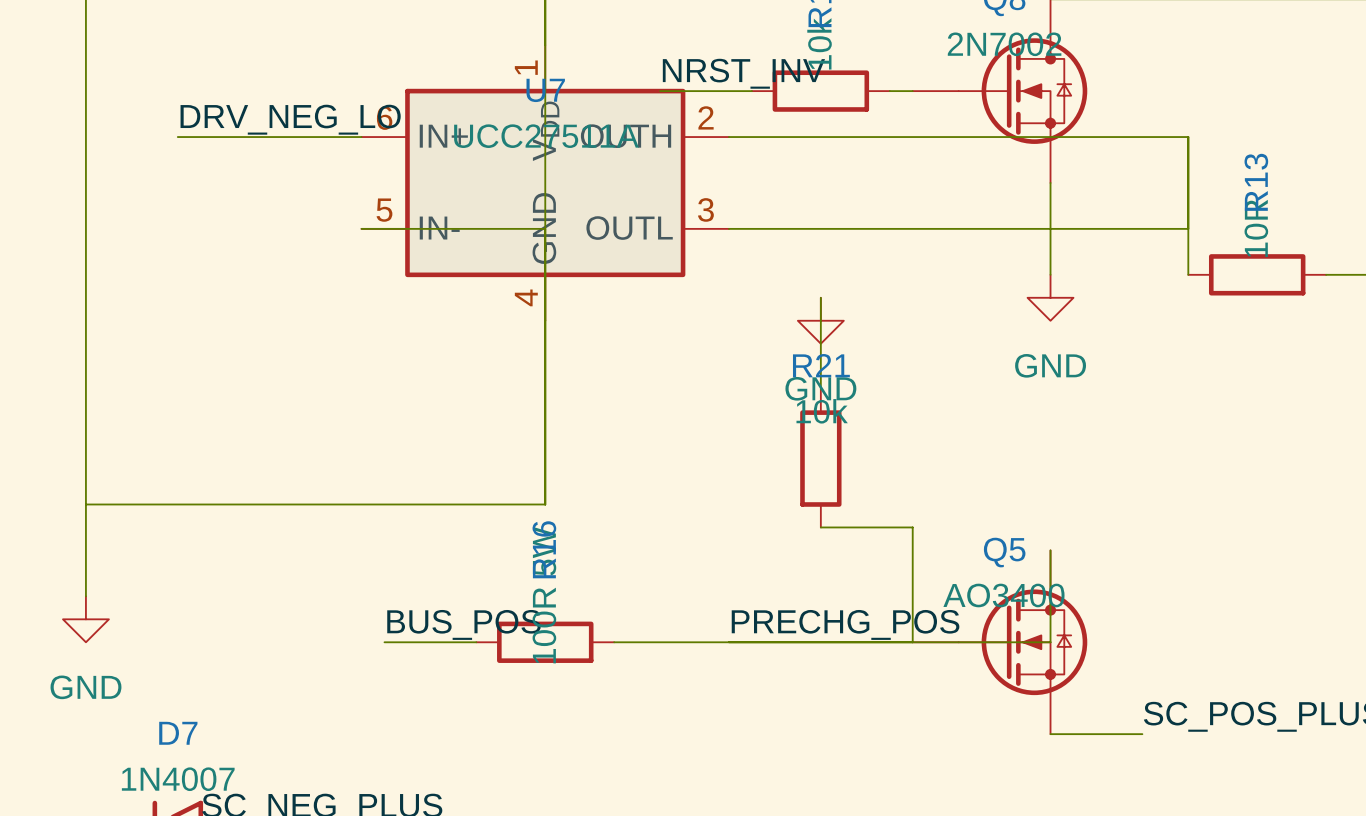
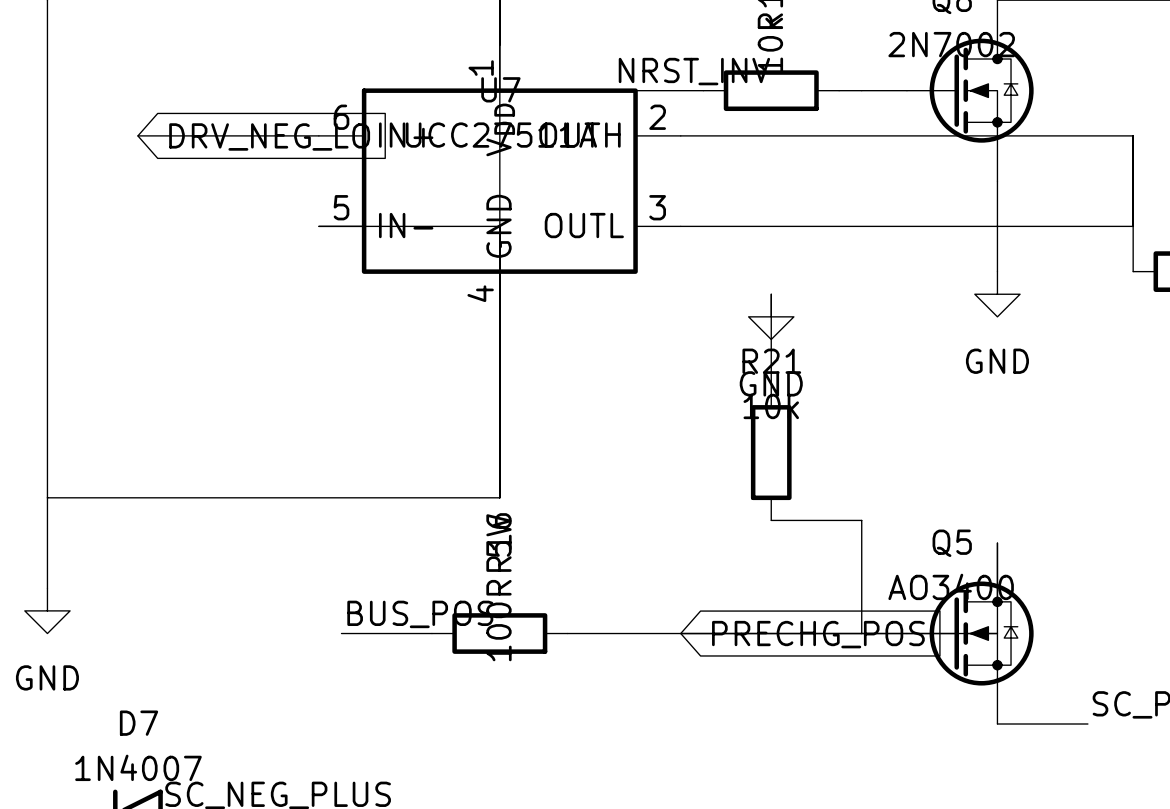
label: DRV_NEG_LO (290, 119) -> none
global label: none -> DRV_NEG_LO (269, 136)
label: PRECHG_POS (845, 624) -> none
global label: none -> PRECHG_POS (818, 634)

